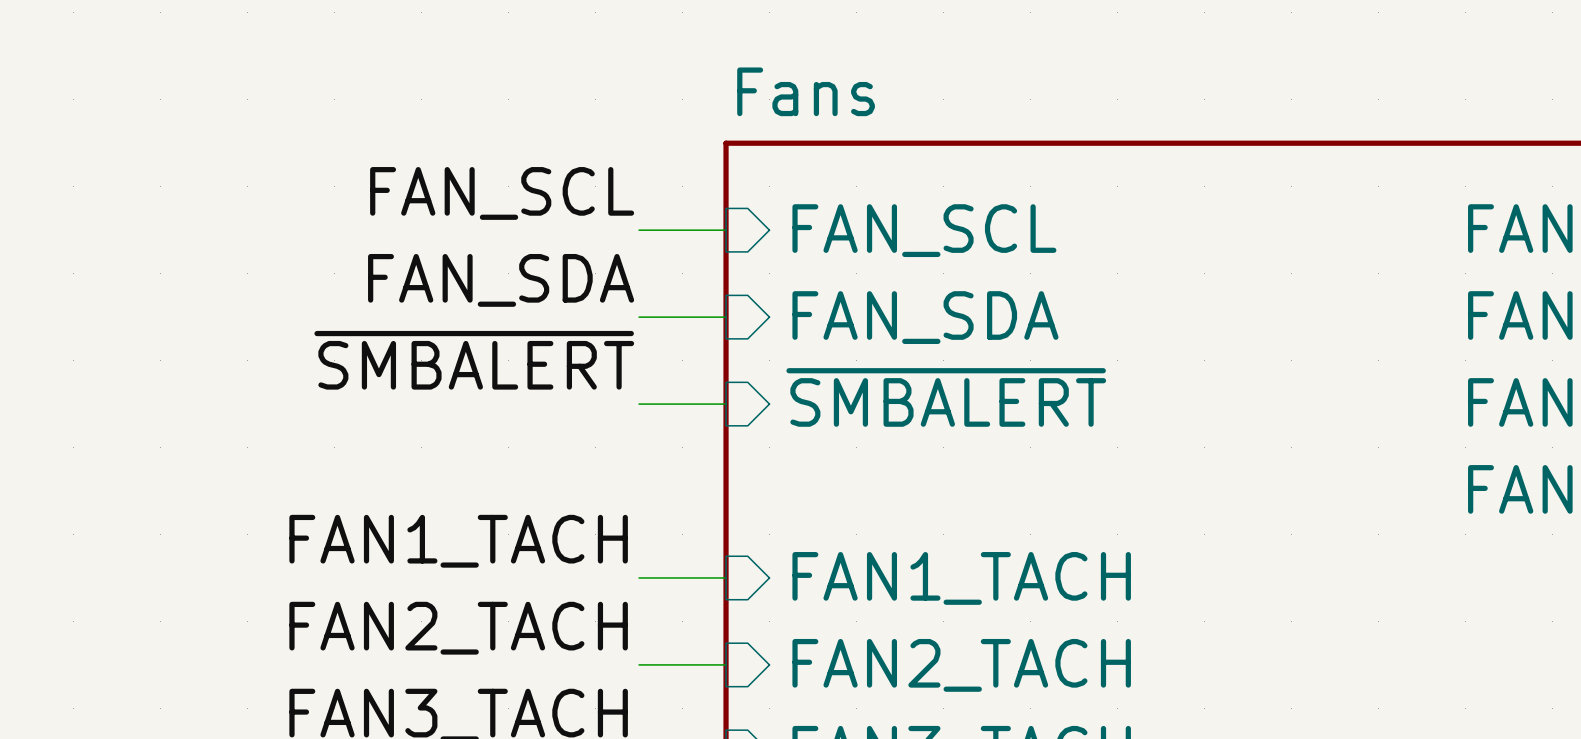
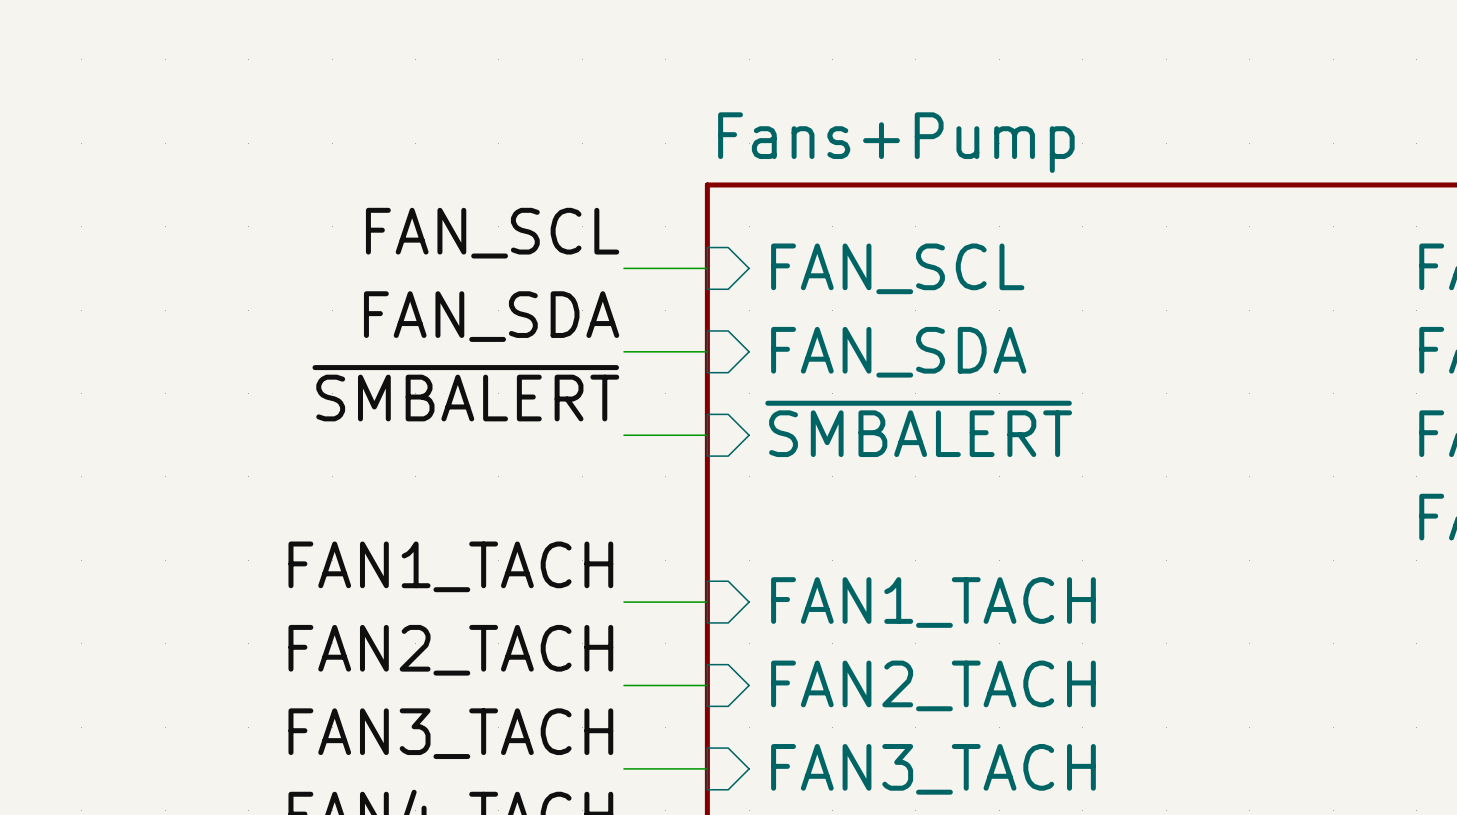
sheet Fans name: Fans (806, 91) -> Fans+Pump (896, 142)

